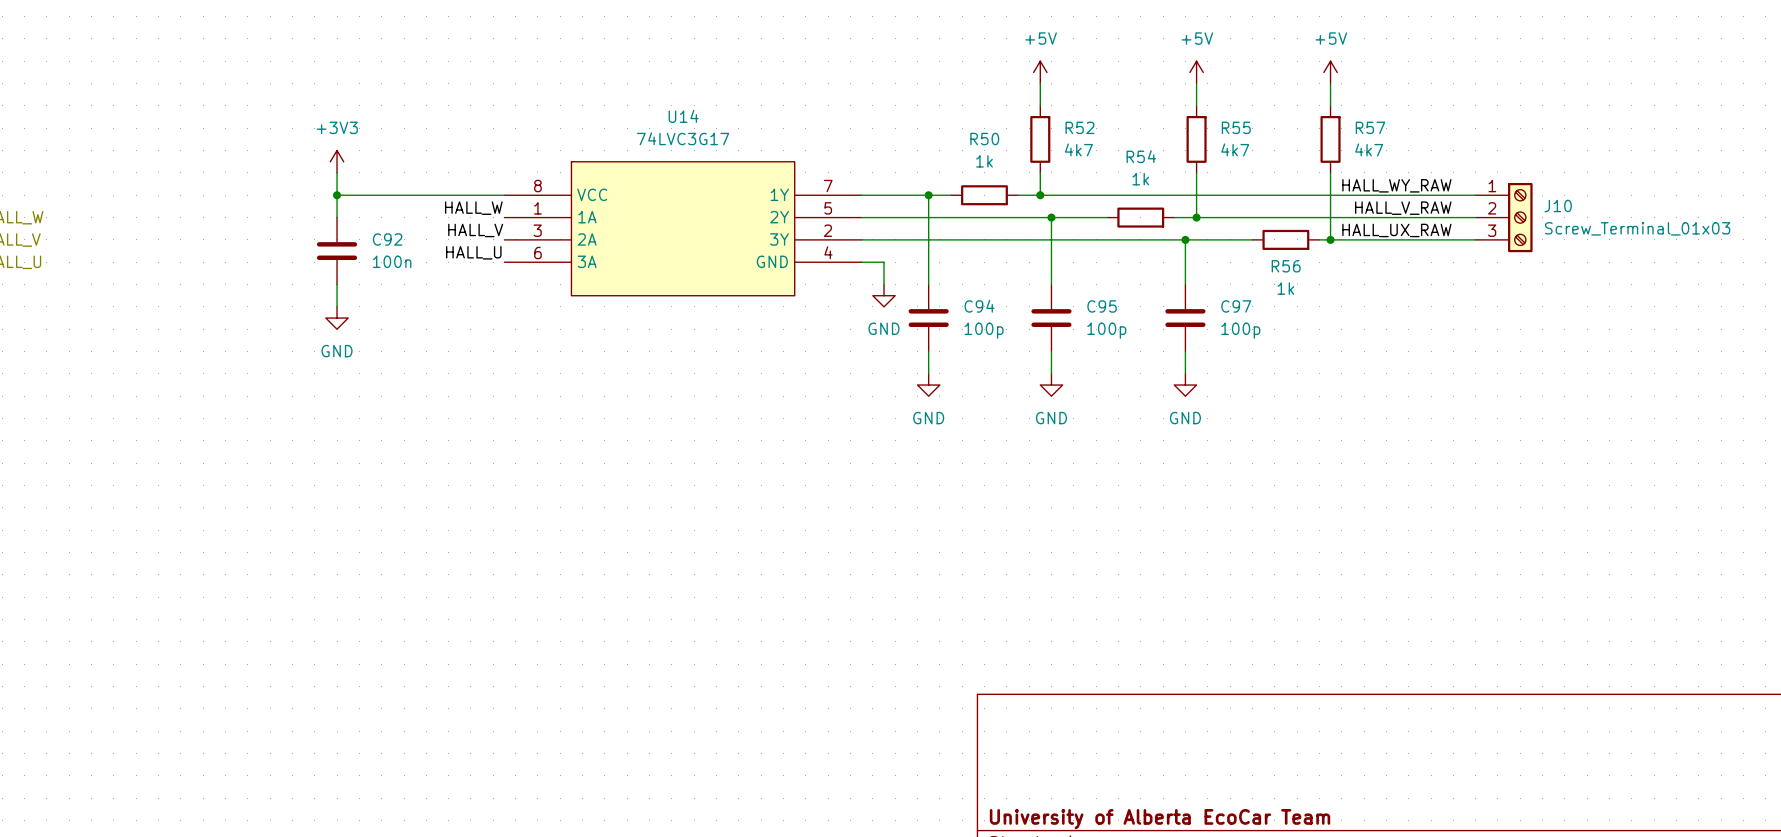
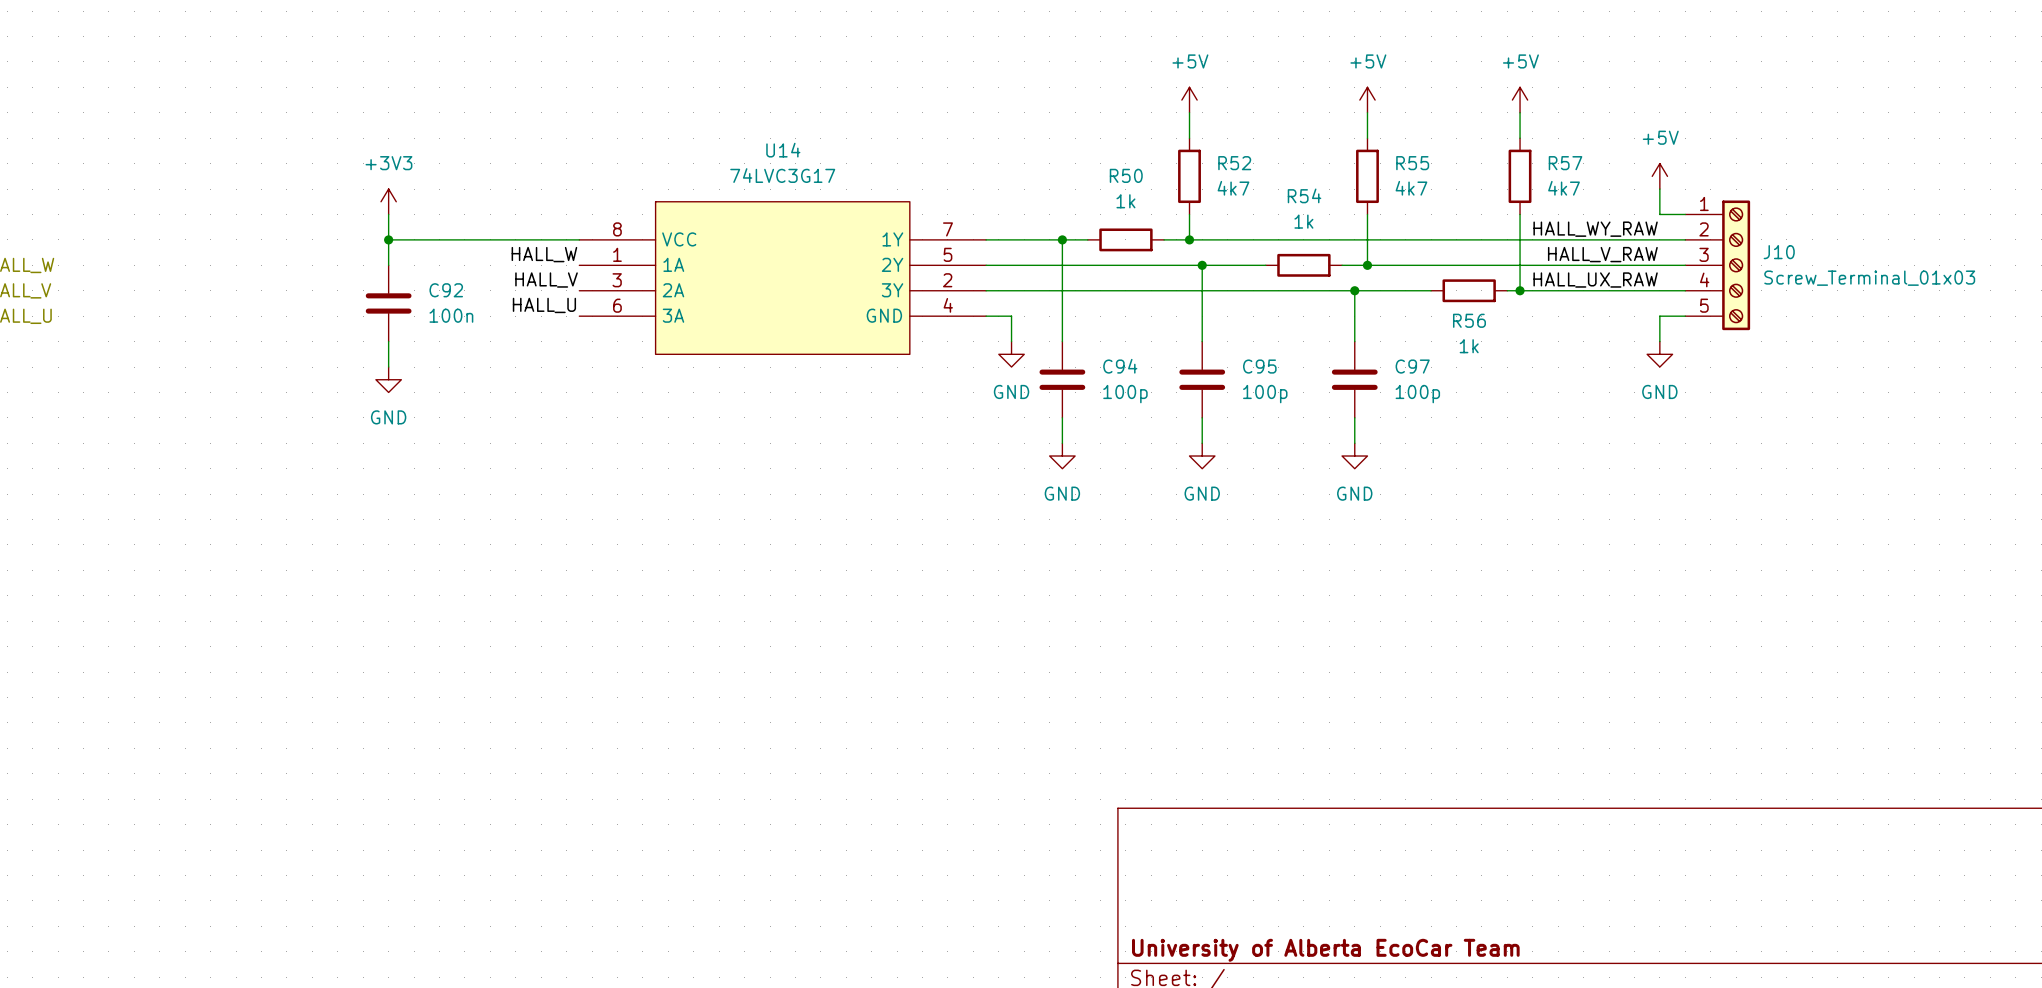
power symbol: none -> +5V (1659, 176)
wire: none -> (1659, 189) (1659, 214) (1685, 214)
J10 symbol: [1475, 182, 1533, 253] -> [1685, 200, 1751, 331]
wire: none -> (1685, 316) (1659, 316) (1659, 341)
power symbol: none -> GND (1659, 354)

